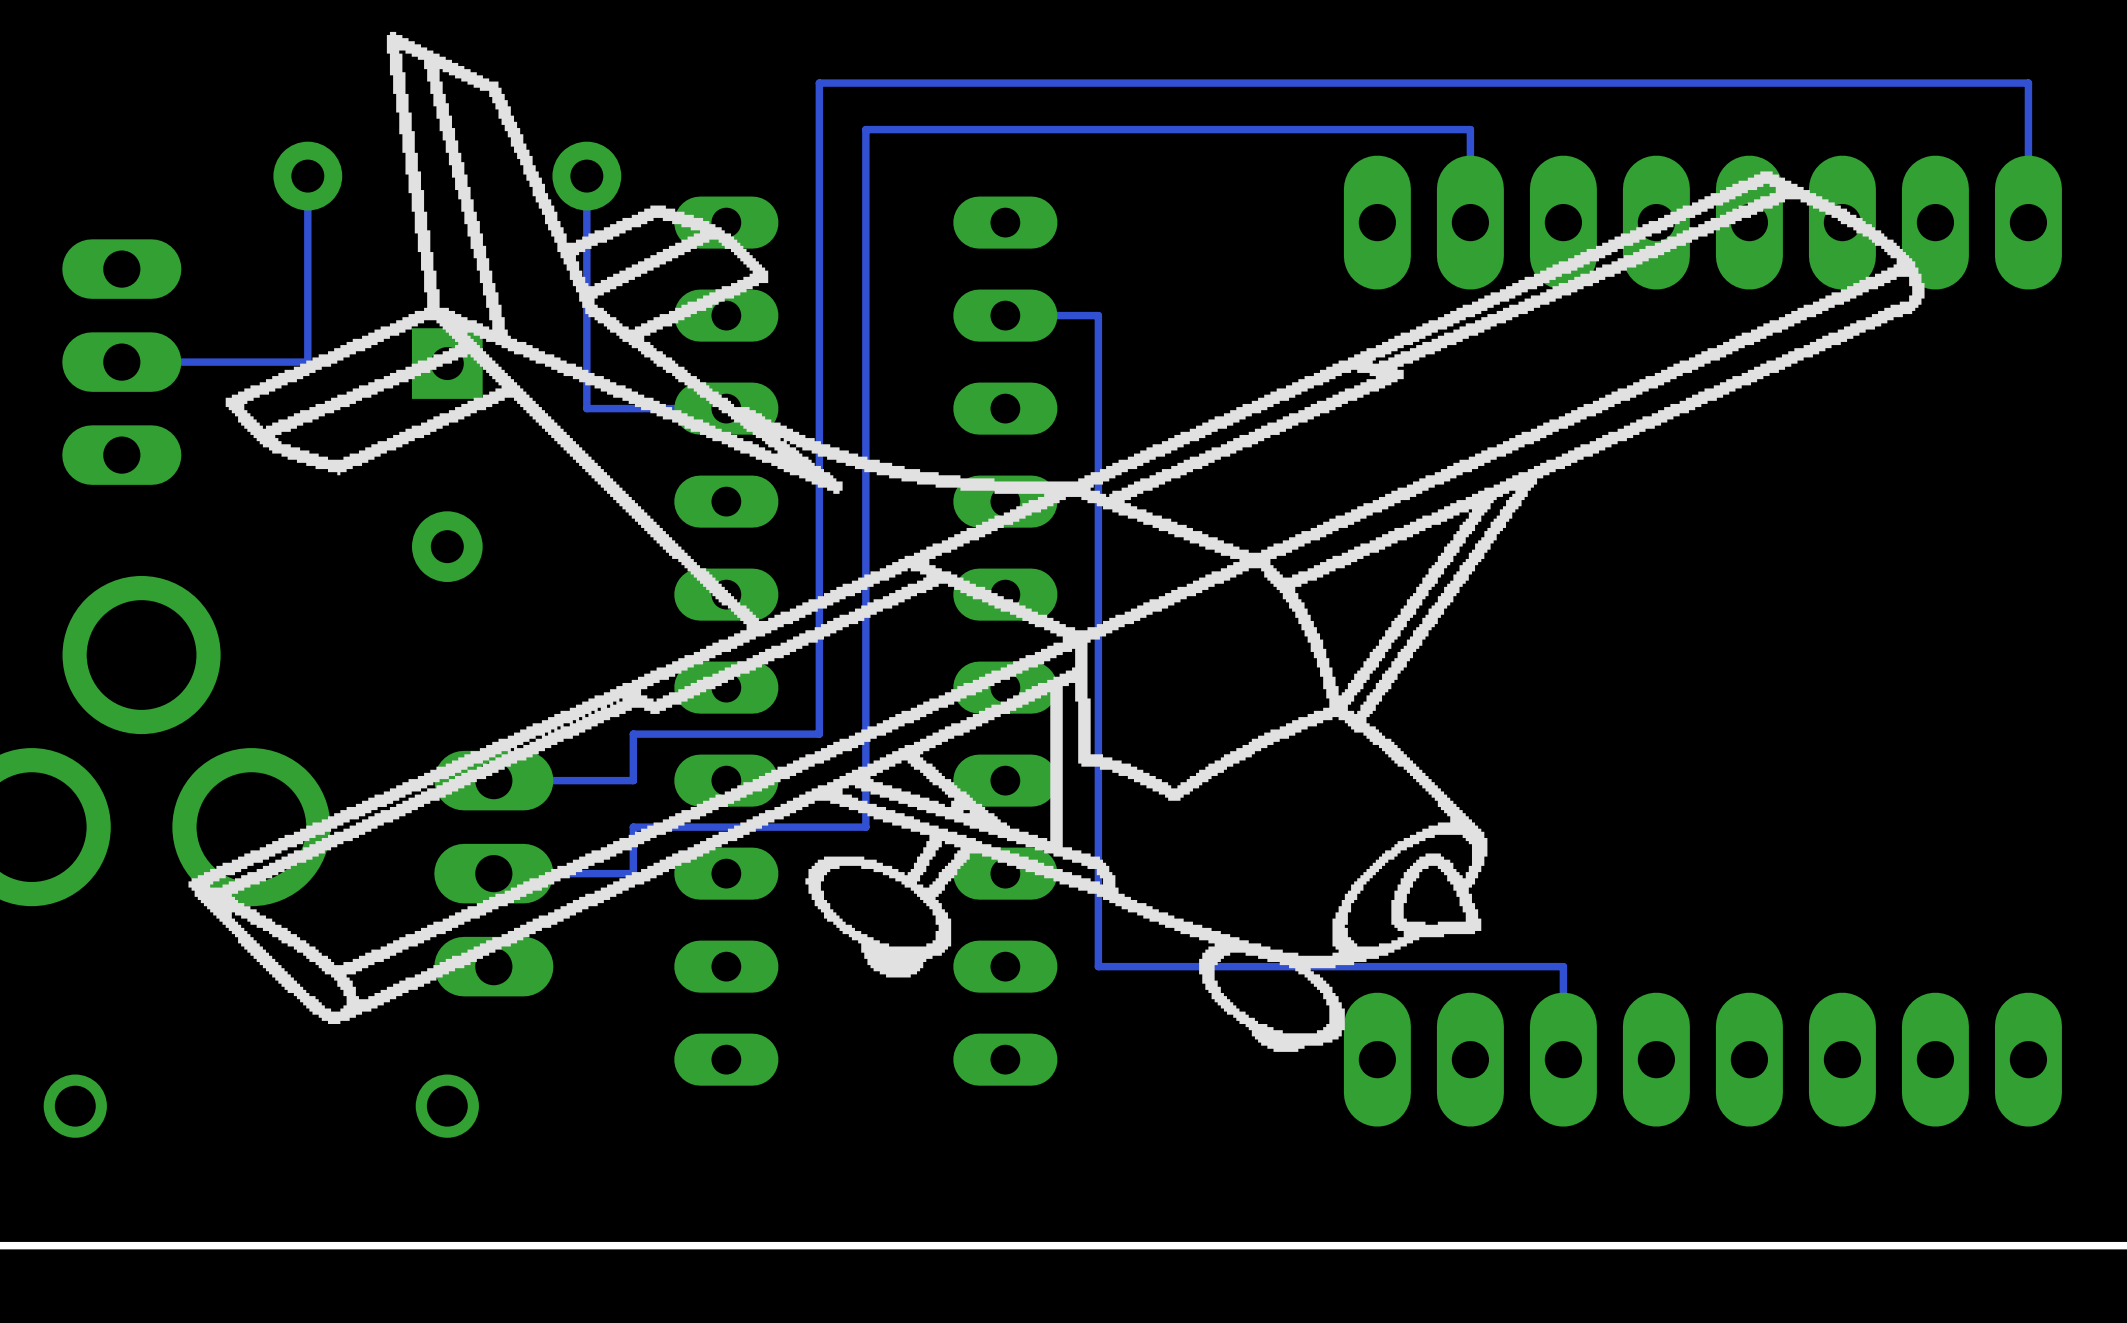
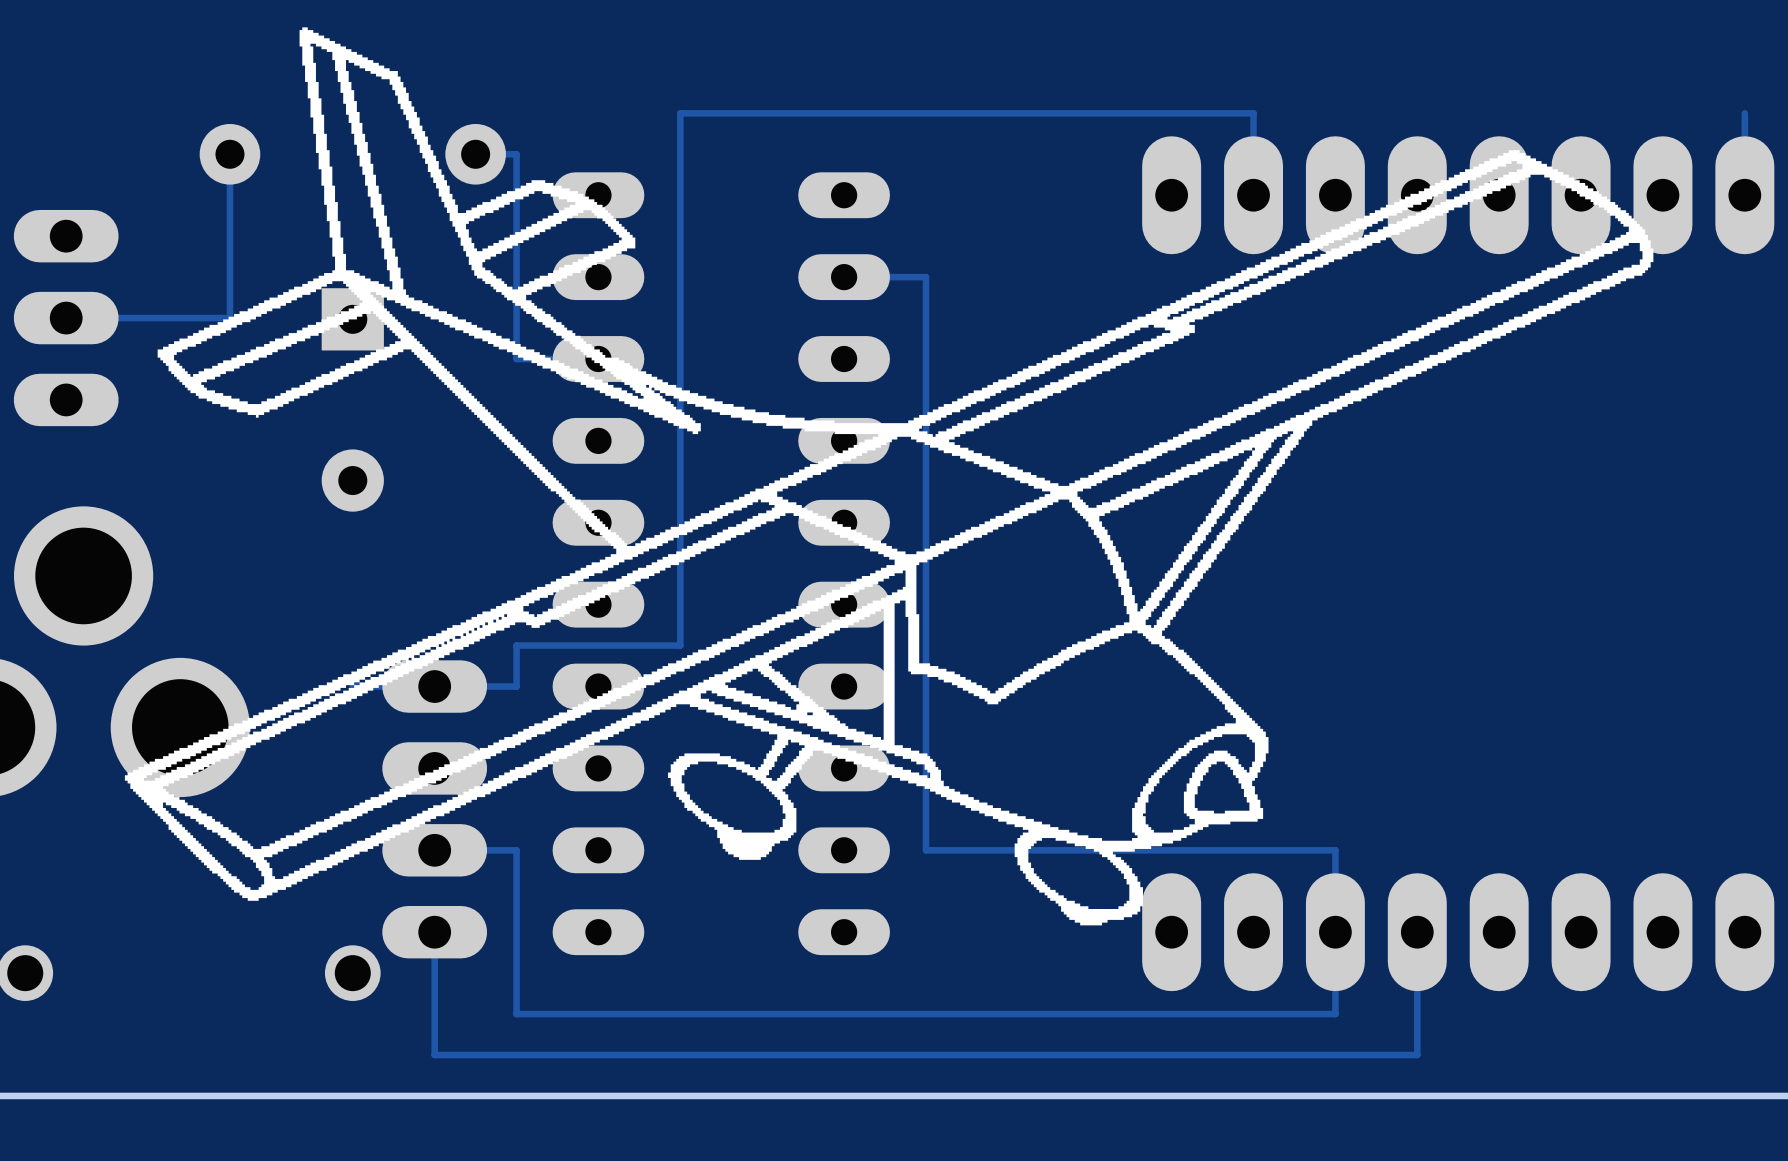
track: (865, 129) (865, 827) (633, 827) (633, 873) (493, 873) -> (721, 113) (680, 113)
track: (2028, 129) (2028, 83) (819, 83) (819, 129) -> none
track: (586, 176) (586, 408) (633, 408) -> (475, 154) (516, 154) (516, 359)
part: (493, 873) -> none
part: none -> (434, 809)
track: none -> (434, 850) (516, 850) (516, 1014) (1335, 1014) (1335, 932)
track: none -> (1417, 932) (1417, 1055) (434, 1055) (434, 932)

